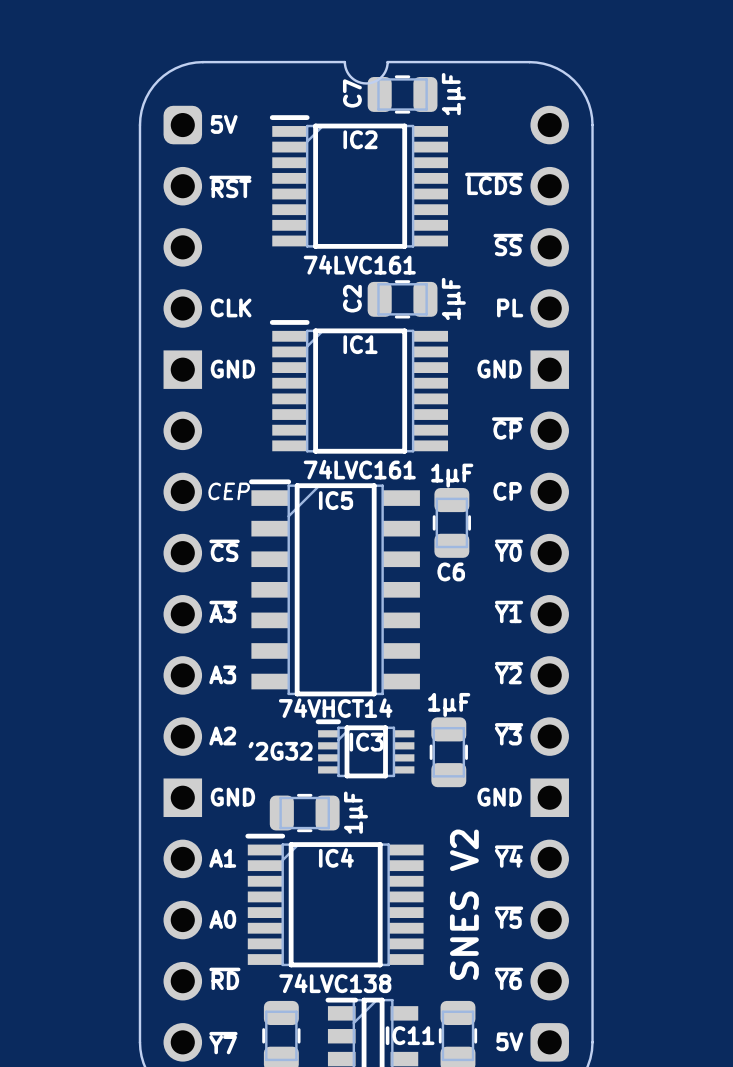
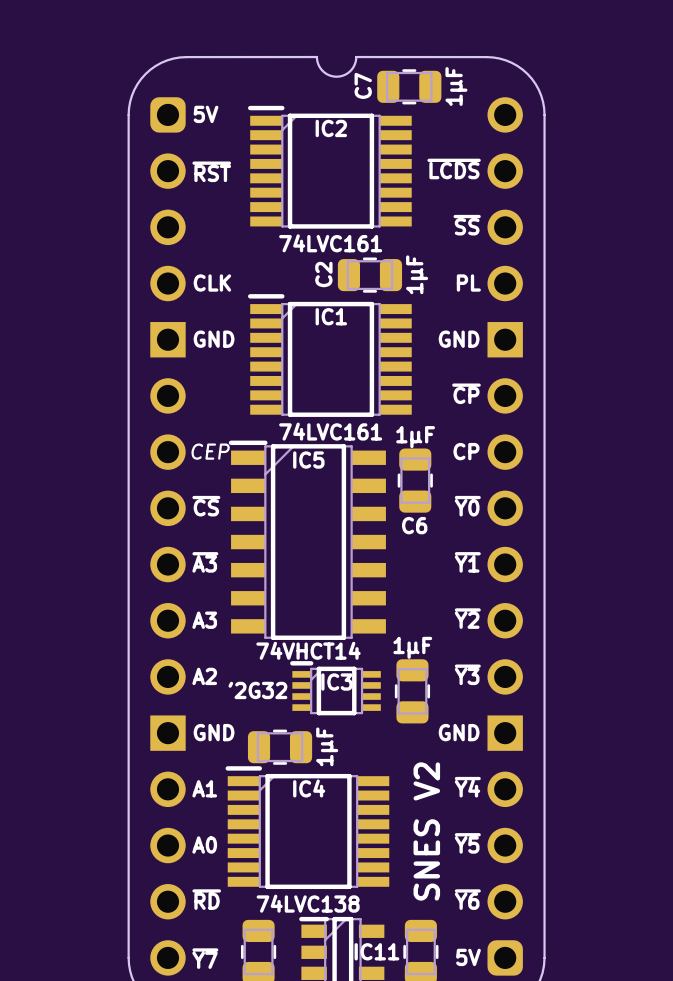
C7 position: (402, 94) -> (409, 86)

